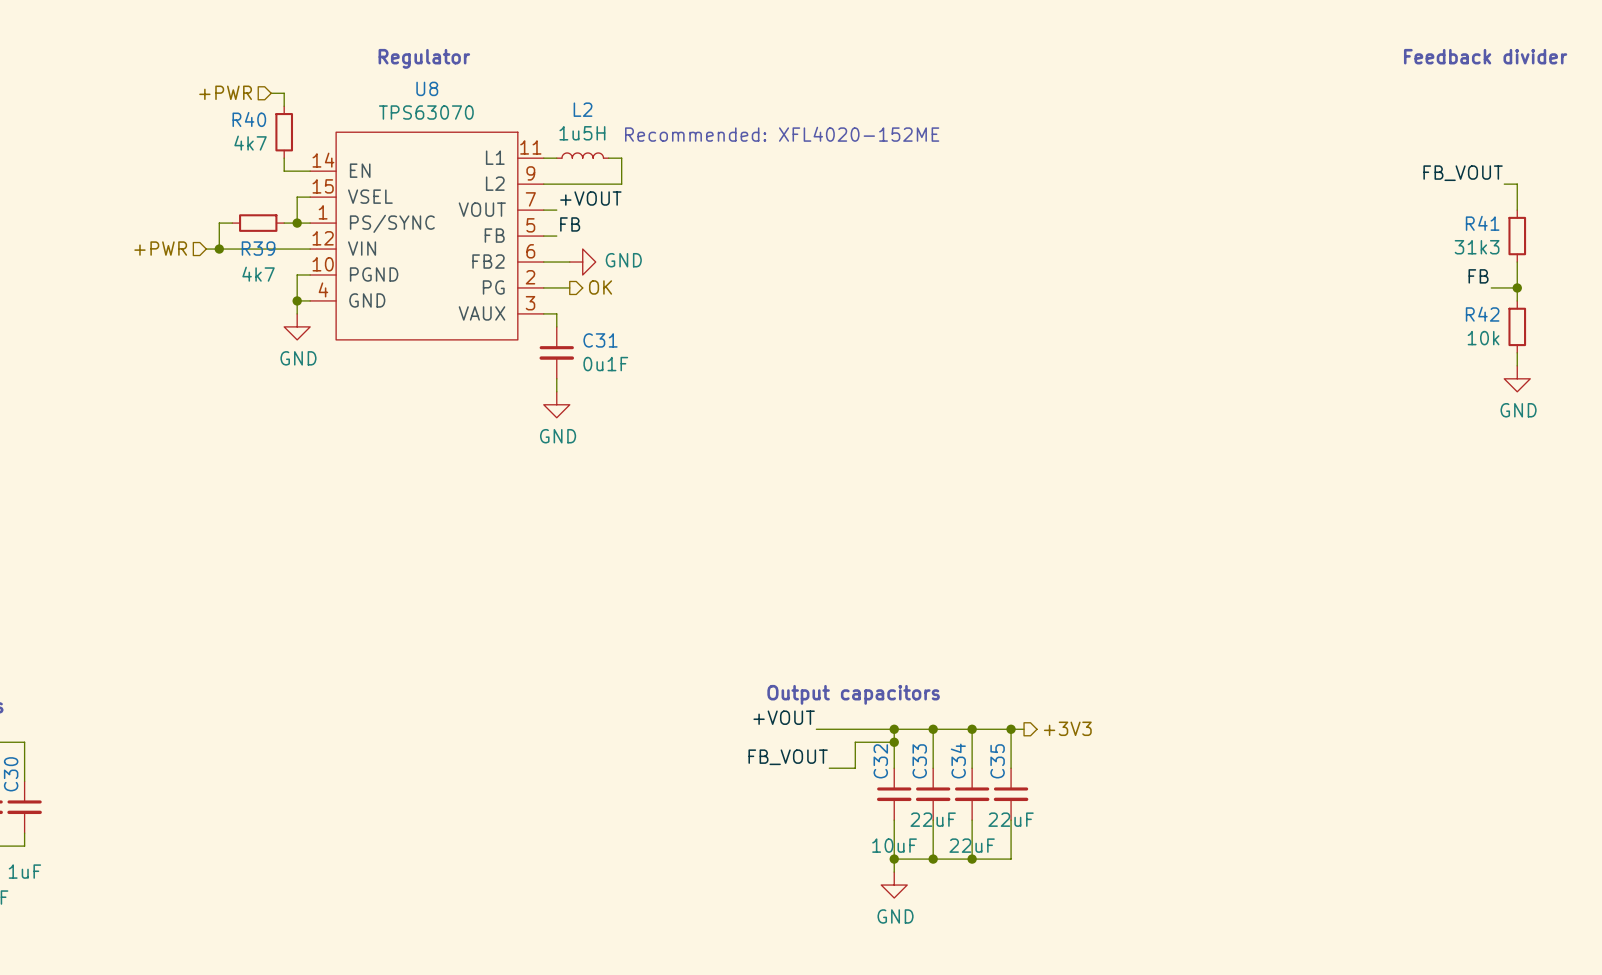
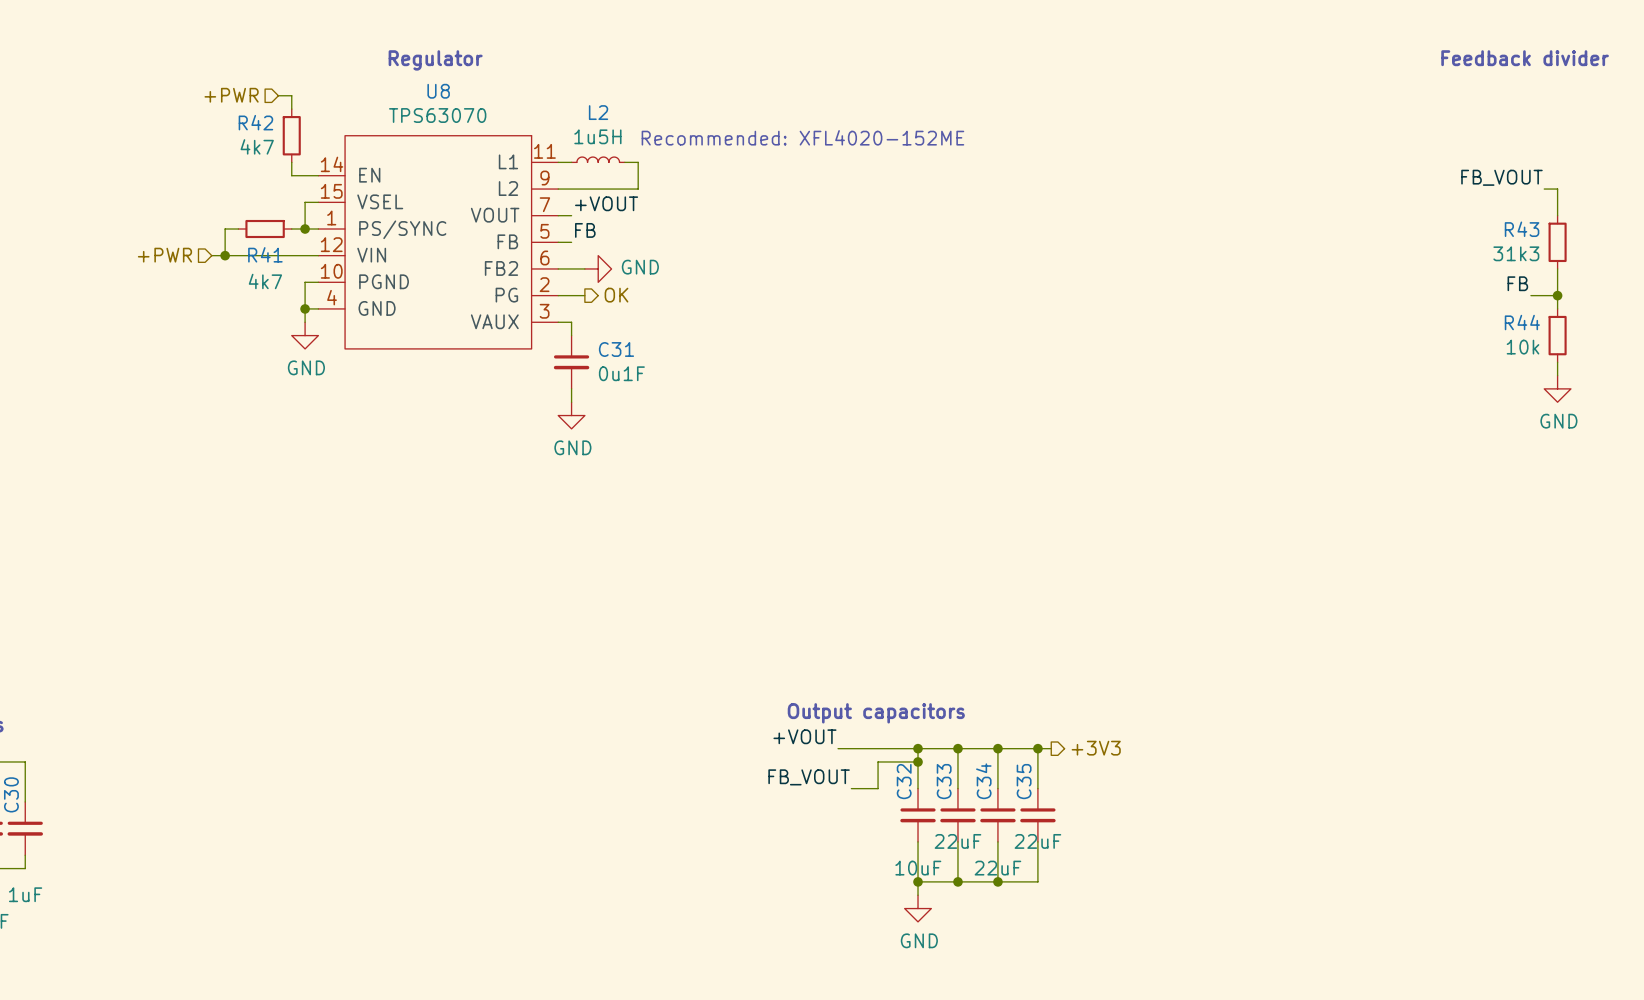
R40 name: R40 (249, 119) -> R42 (255, 122)
R41 name: R41 (1482, 223) -> R43 (1522, 229)
R39 name: R39 (258, 248) -> R41 (265, 254)
R42 name: R42 (1482, 314) -> R44 (1522, 322)

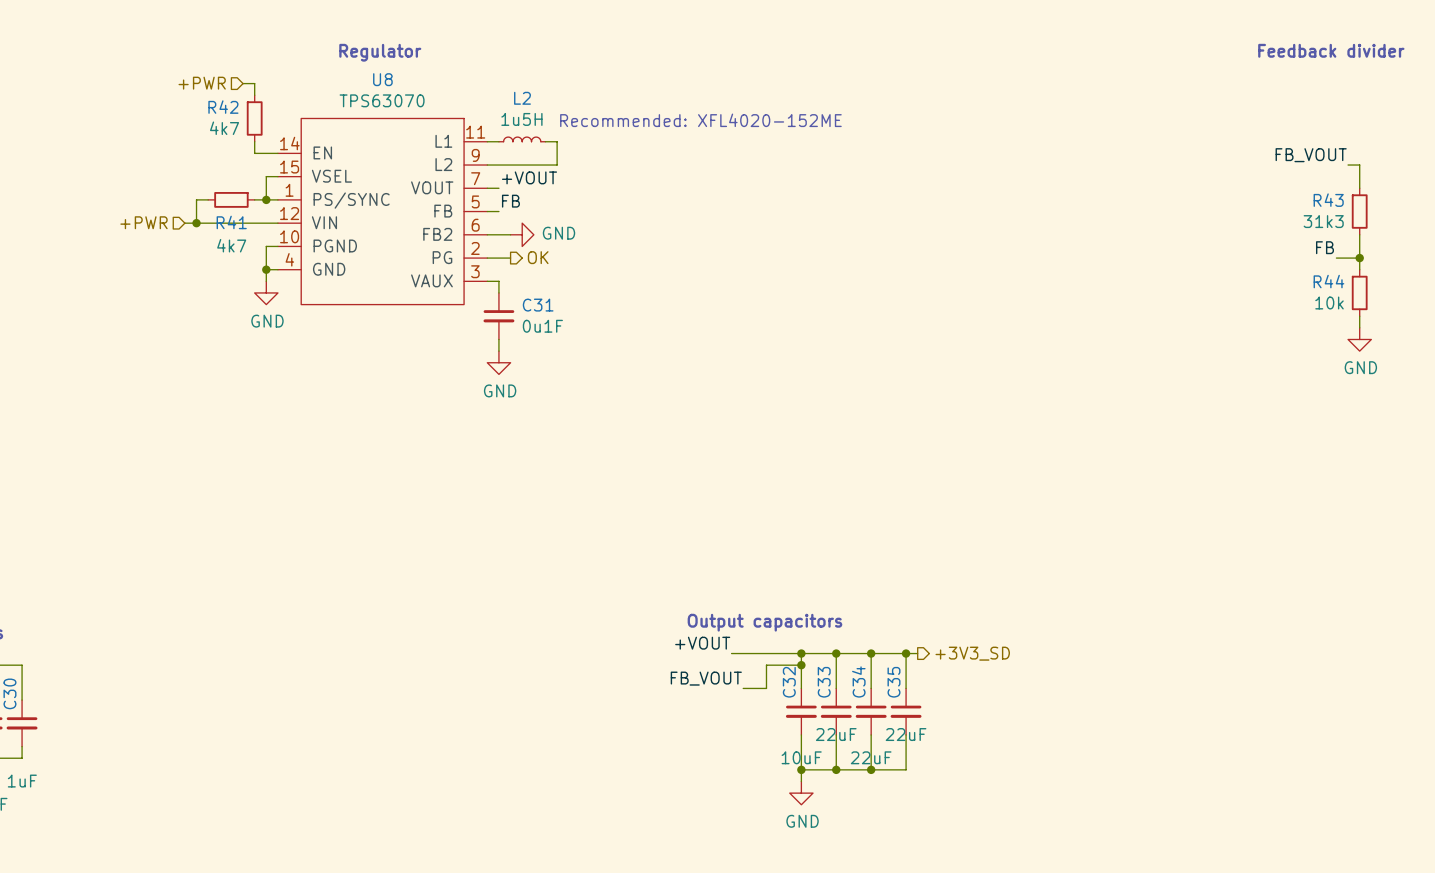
hierarchical label: +3V3 (1096, 748) -> +3V3_SD (972, 653)

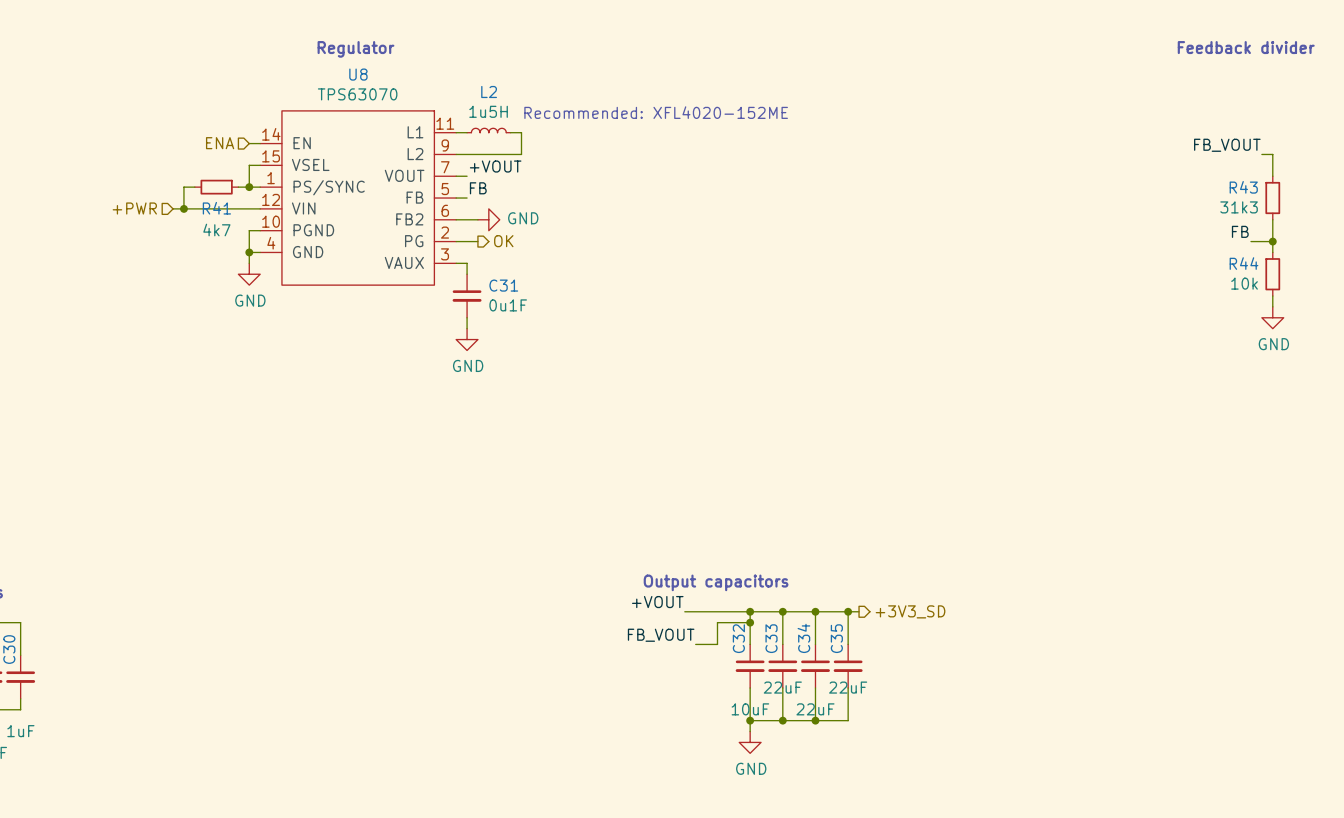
hierarchical label: +PWR (202, 83) -> none
wire: (243, 83) (254, 83) (254, 95) -> none
R42: 4k7 (254, 118) -> none
wire: (254, 141) (254, 153) (266, 153) -> none
hierarchical label: none -> ENA (220, 143)

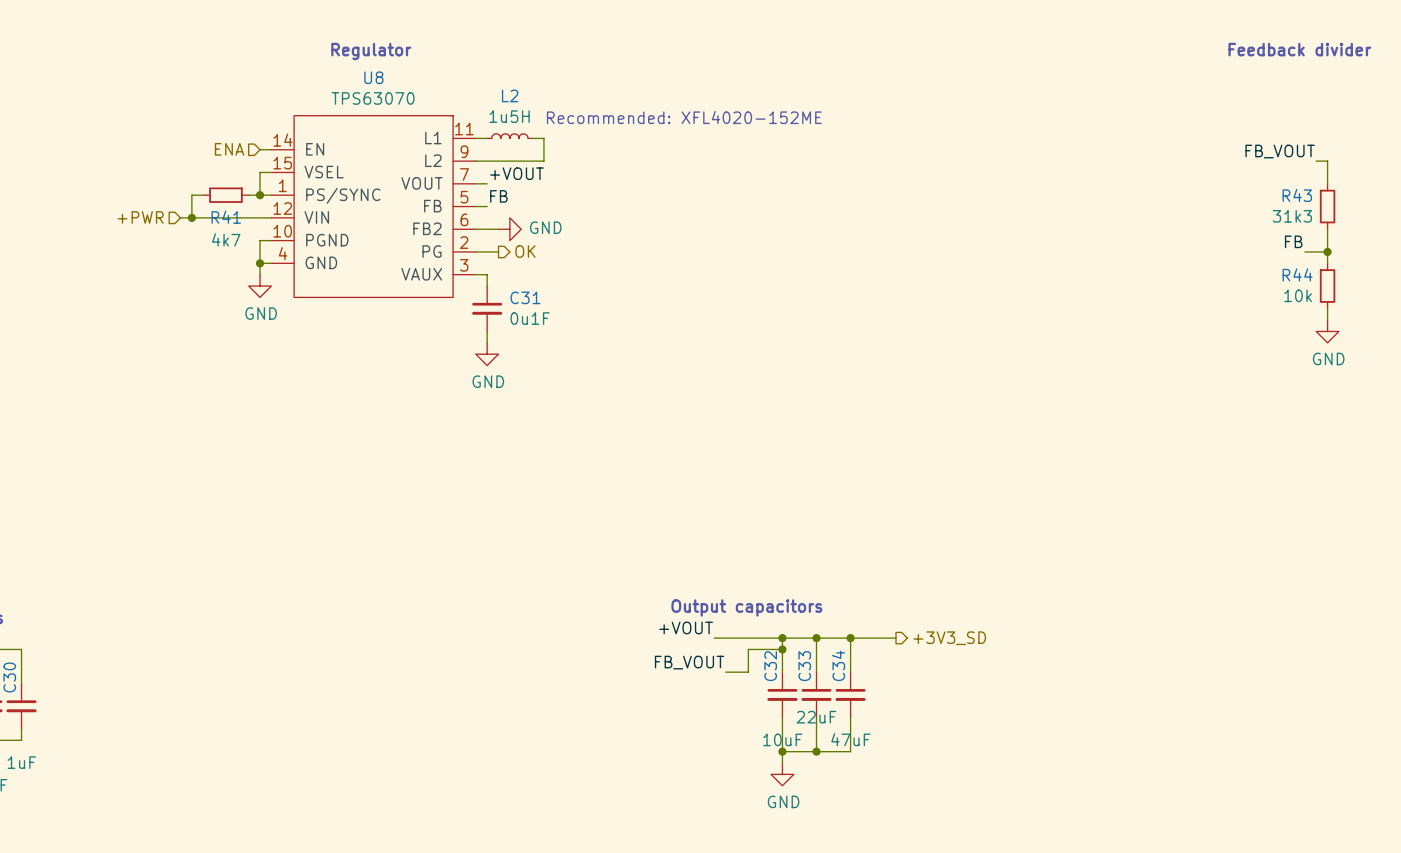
wire: (848, 611) (848, 644) -> none
junction: (848, 611) -> none
C35: 22uF (848, 666) -> none
wire: (848, 687) (848, 720) (815, 720) -> none
C34 value: 22uF (815, 709) -> 47uF (850, 739)
junction: (815, 720) -> none

